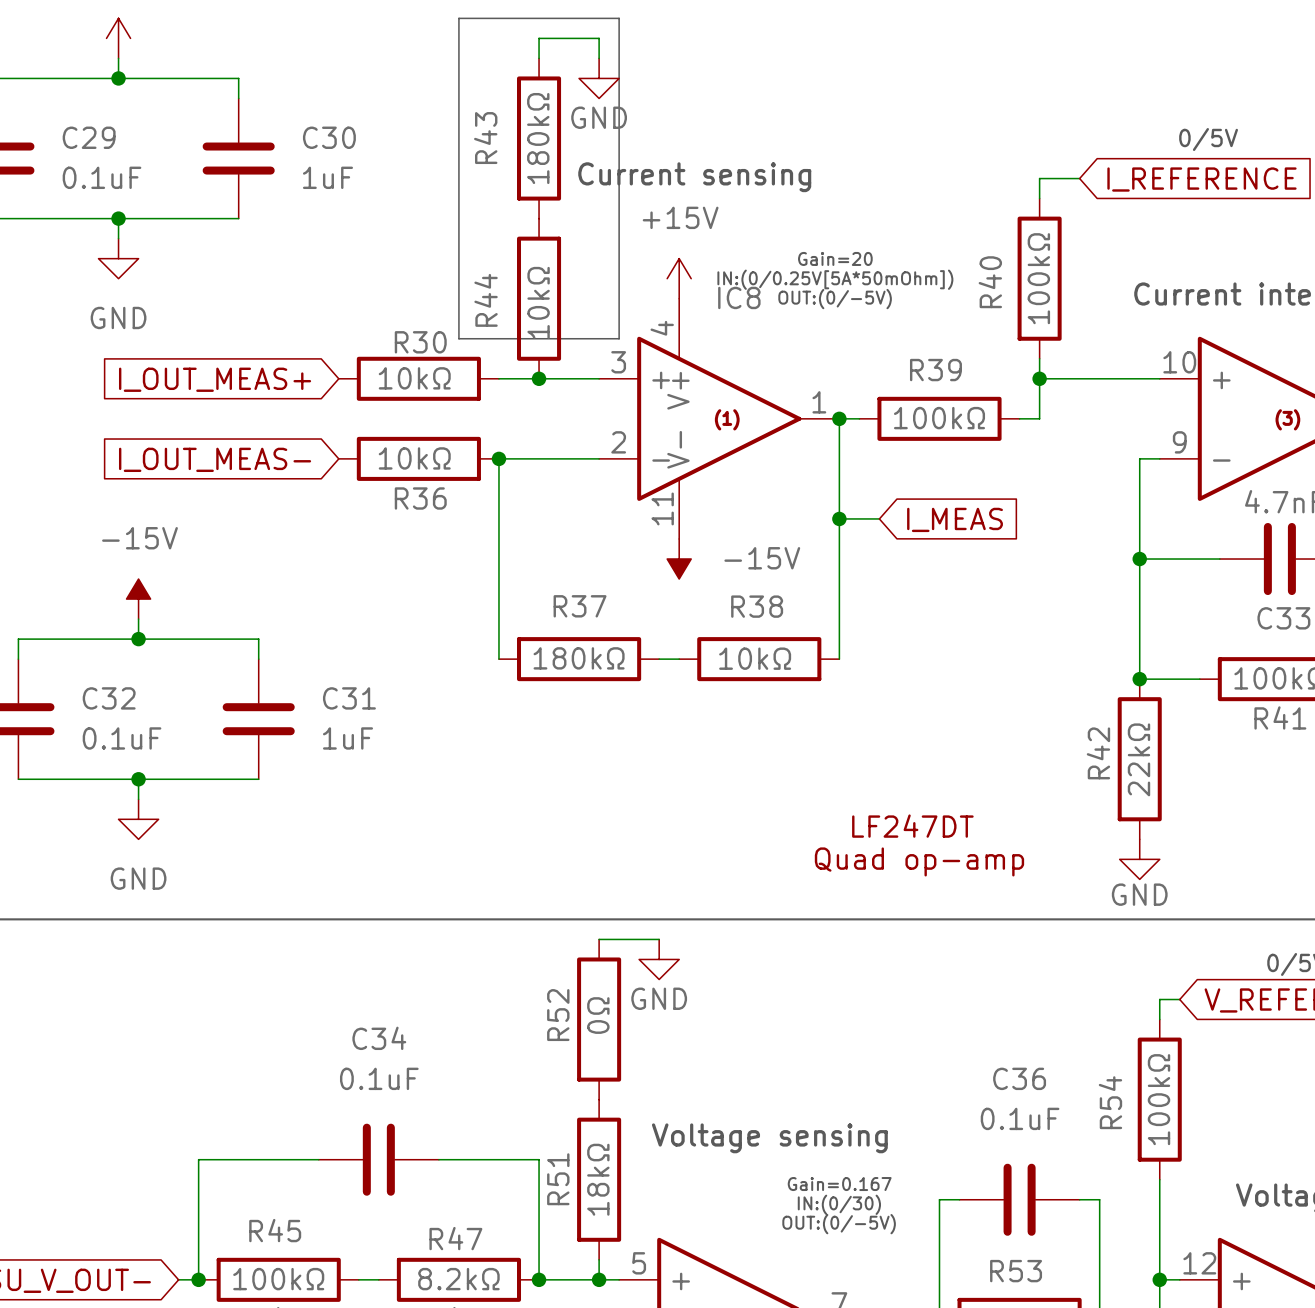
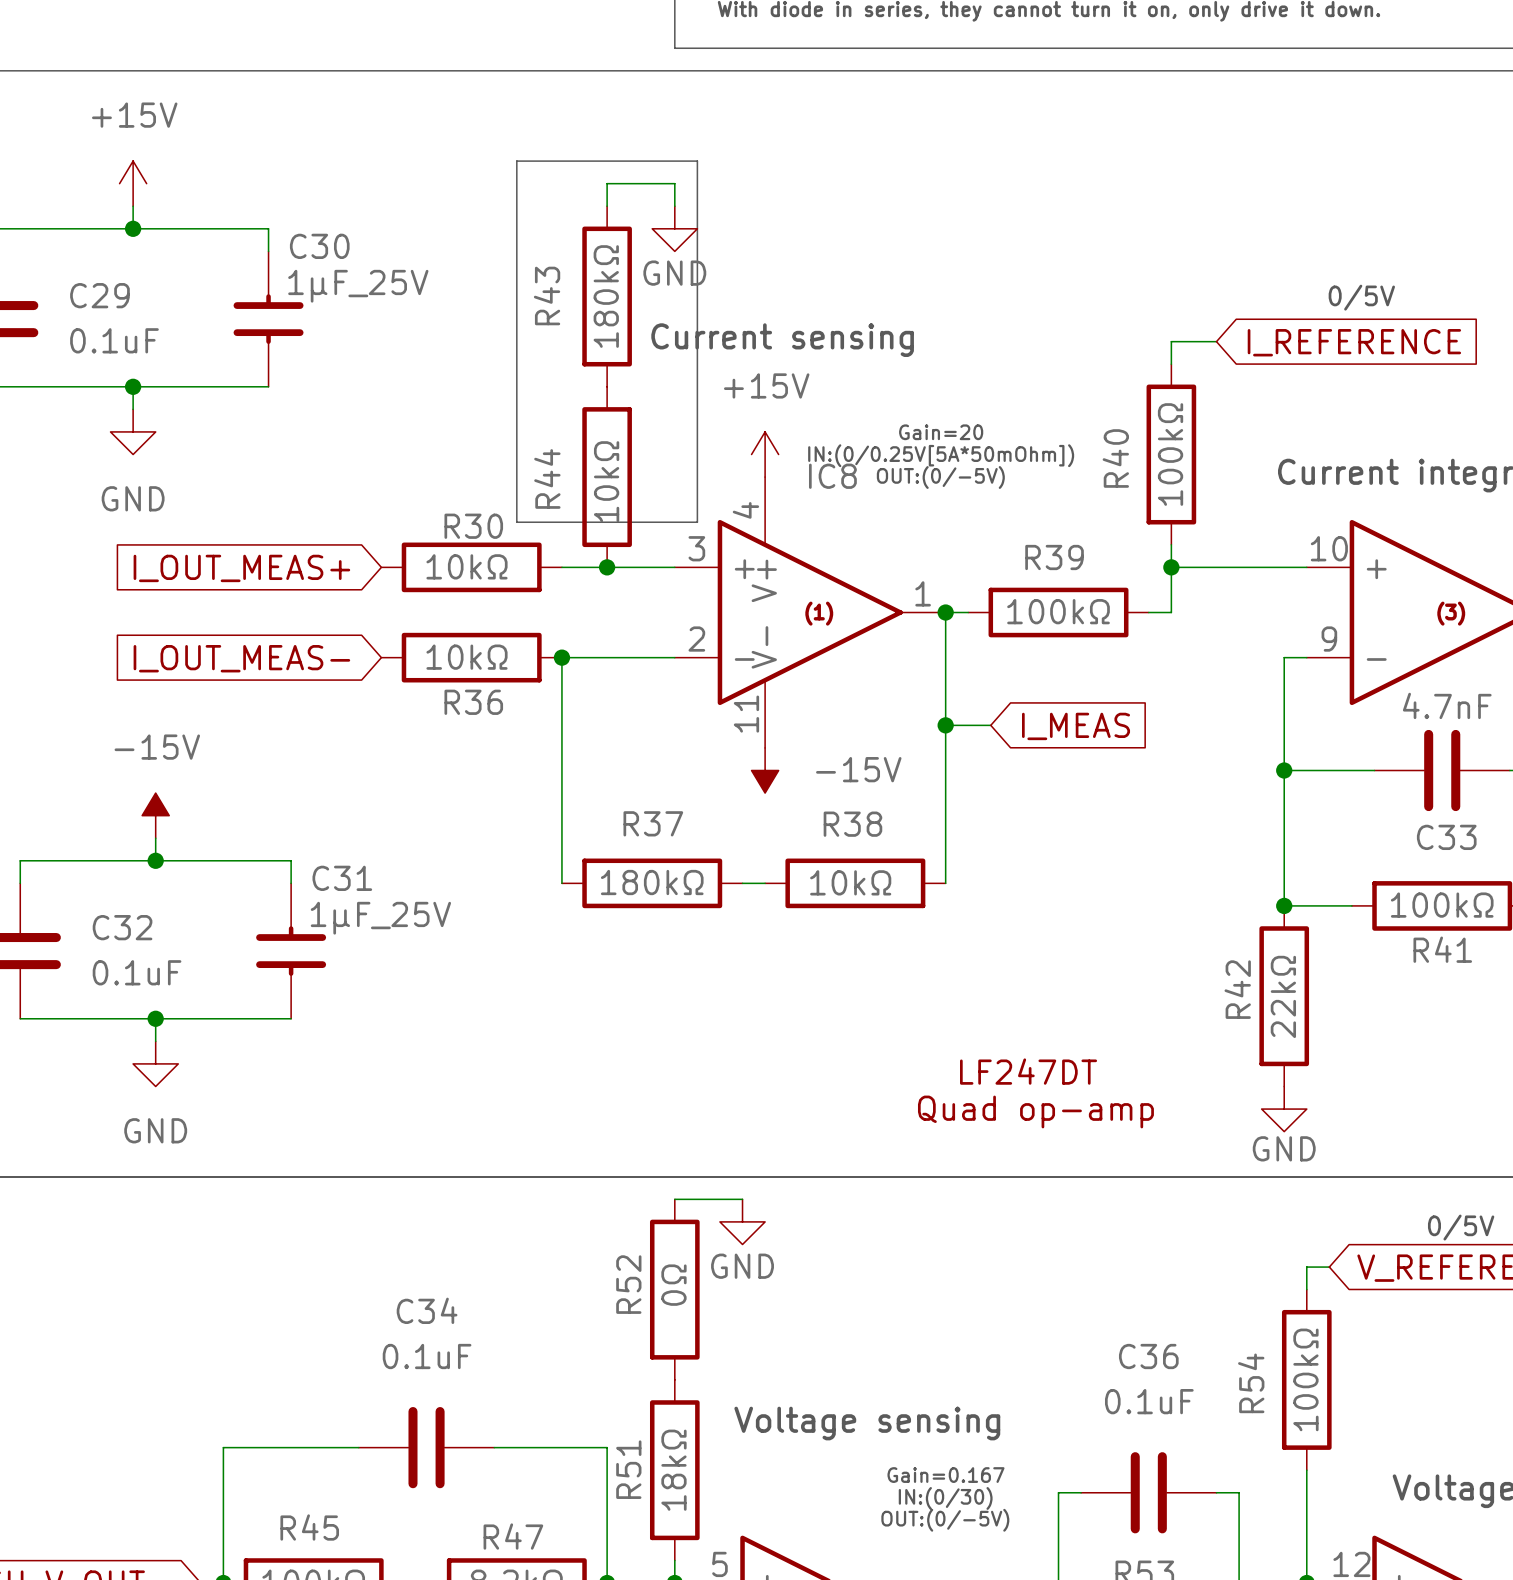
C30 symbol: [202, 98, 275, 219] -> [233, 251, 304, 387]
C30 name position: C30 (329, 137) -> C30 (319, 246)
C30 value: 1uF (327, 177) -> 1μF_25V (358, 286)
C31 symbol: [222, 659, 295, 780] -> [256, 883, 327, 1019]
C31 name position: C31 (349, 698) -> C31 (342, 878)
C31 value: 1uF (348, 738) -> 1μF_25V (380, 918)

